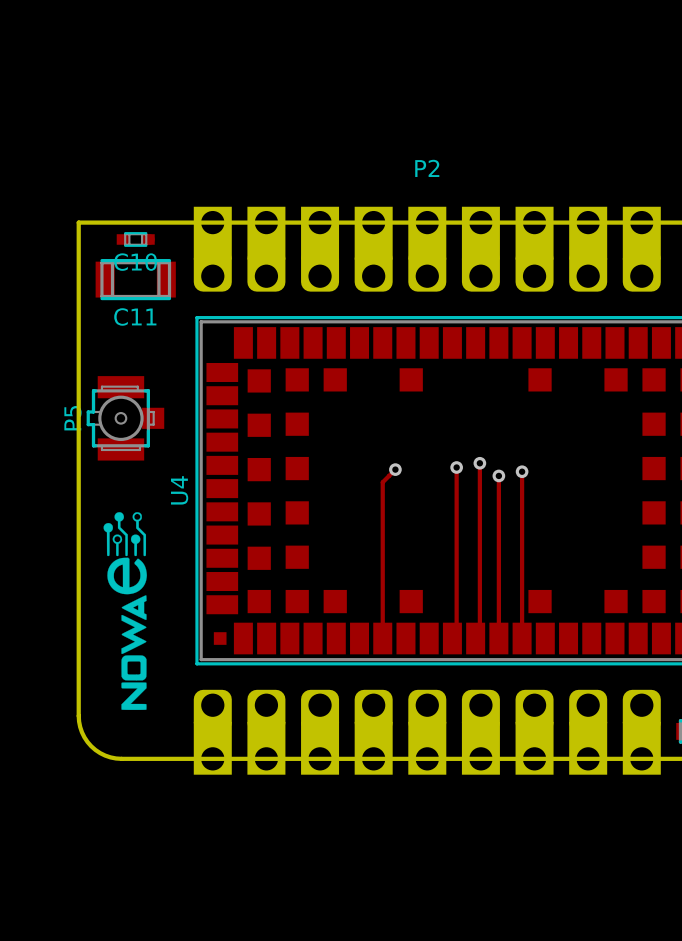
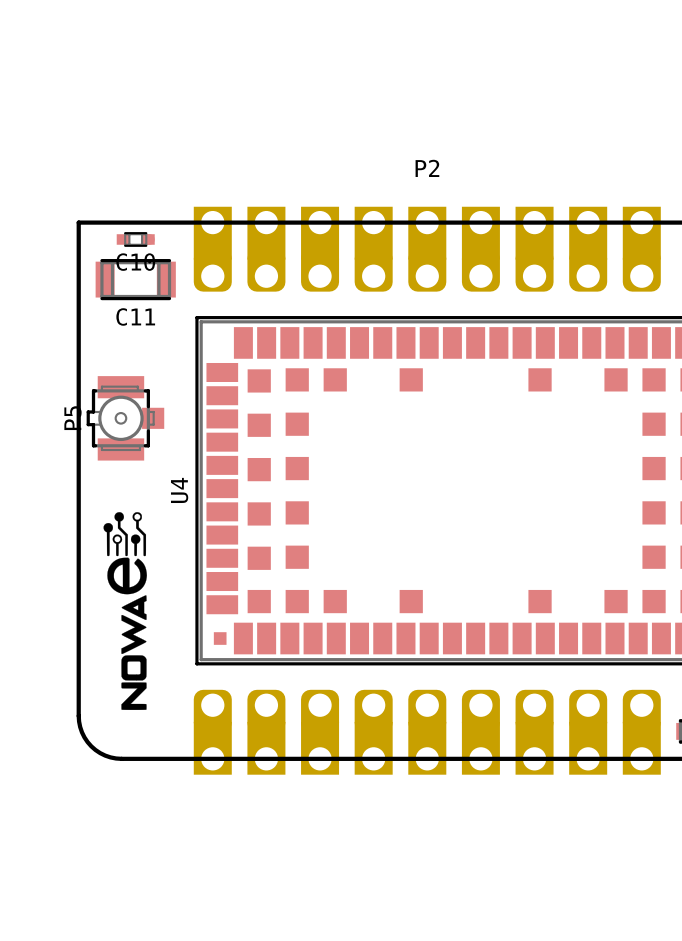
top track: (479, 463) (479, 634) (475, 638) -> none
via: (479, 463) -> none
top track: (456, 467) (456, 634) (452, 638) -> none
via: (456, 467) -> none
top track: (395, 469) (382, 482) (382, 638) -> none
via: (395, 469) -> none
top track: (522, 471) (522, 638) -> none
via: (522, 471) -> none
top track: (498, 475) (498, 638) -> none
via: (498, 475) -> none

